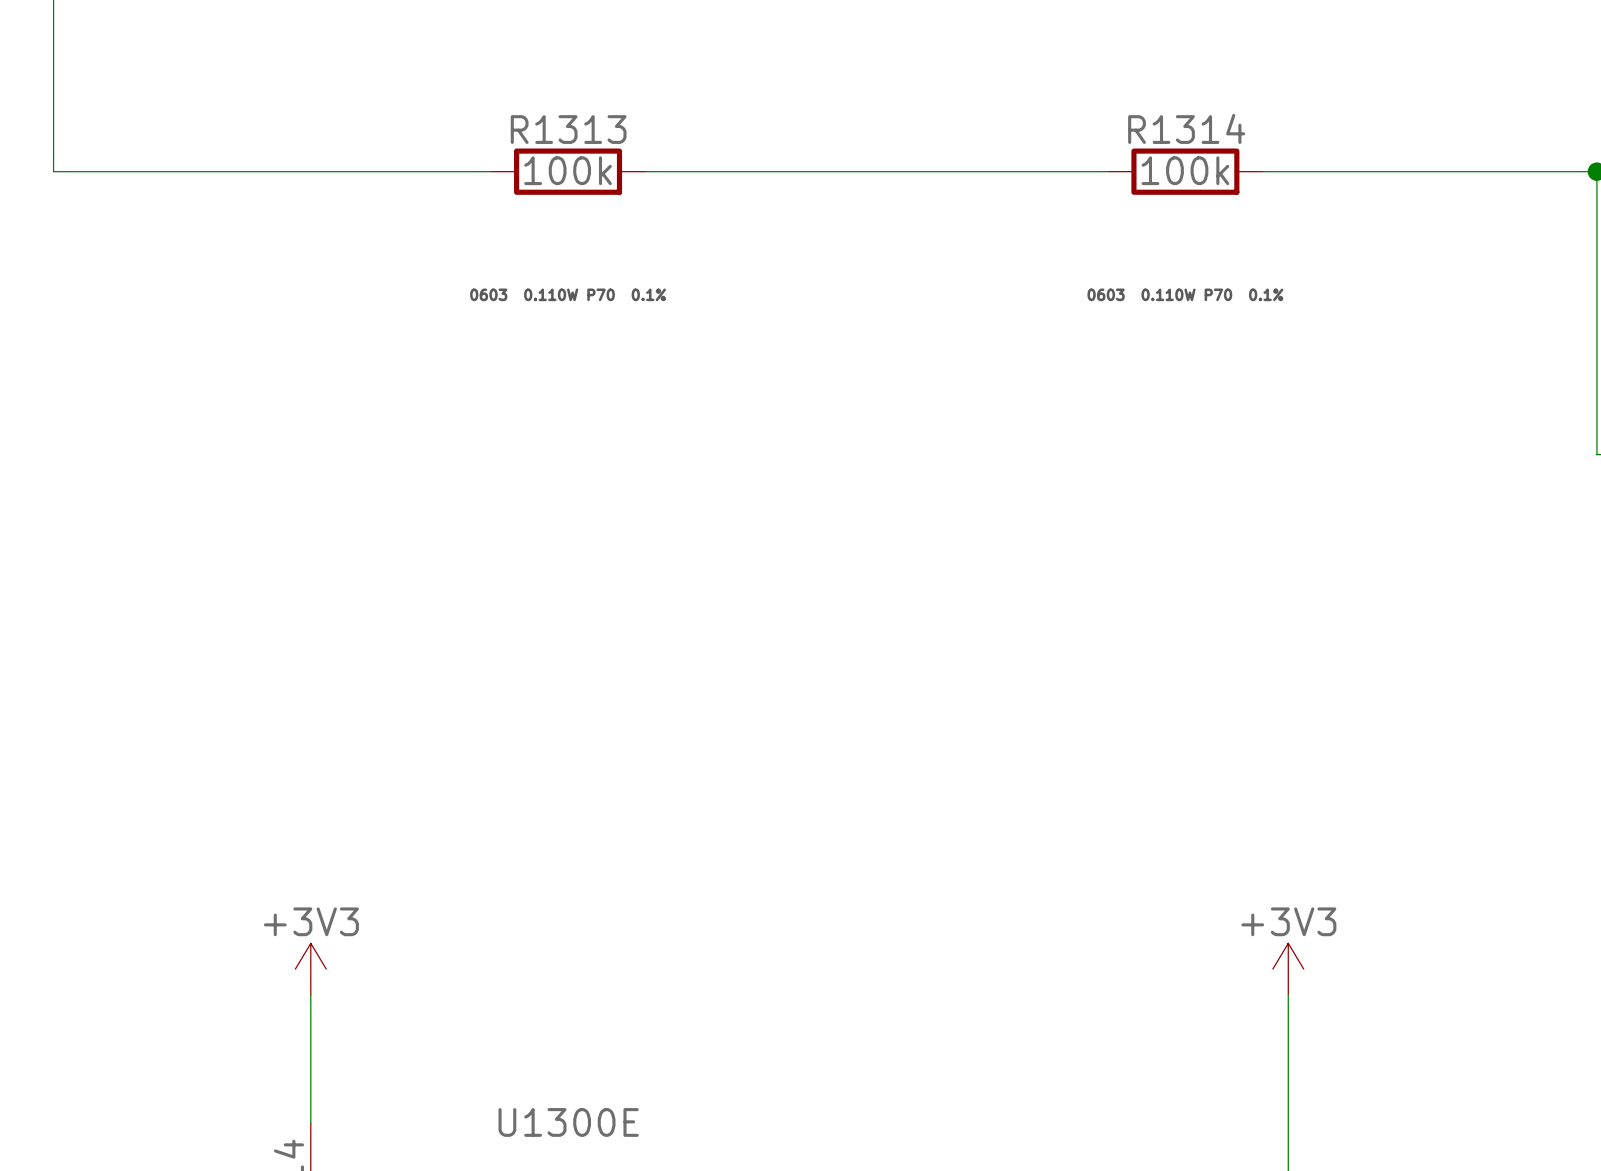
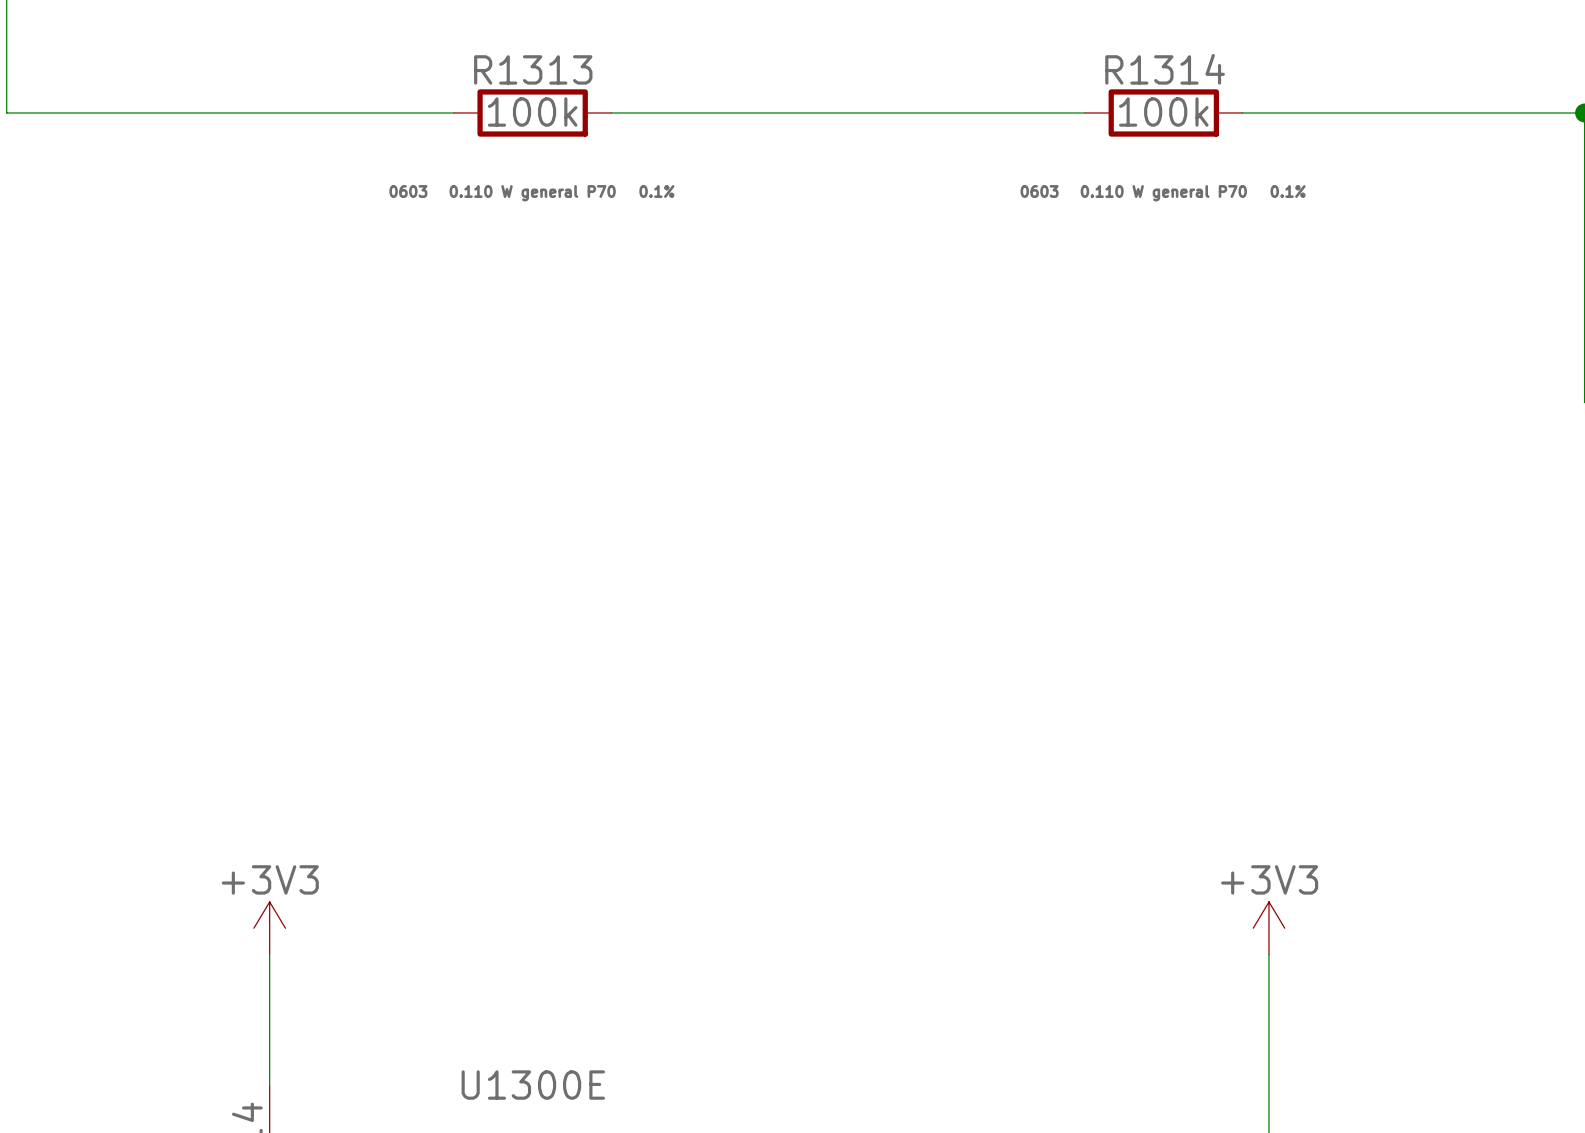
R1313 text: none -> 0603 (408, 191)
R1313 text: none -> 0.1% (656, 191)
R1314 text: none -> 0603 (1039, 191)
R1314 text: none -> 0.1% (1288, 191)
R1313 text: none -> 0.110 W general P70 (532, 193)
R1314 text: none -> 0.110 W general P70 (1163, 193)
text: 0603 0.110W P70 0.1% (568, 294) -> none
text: 0603 0.110W P70 0.1% (1185, 294) -> none

